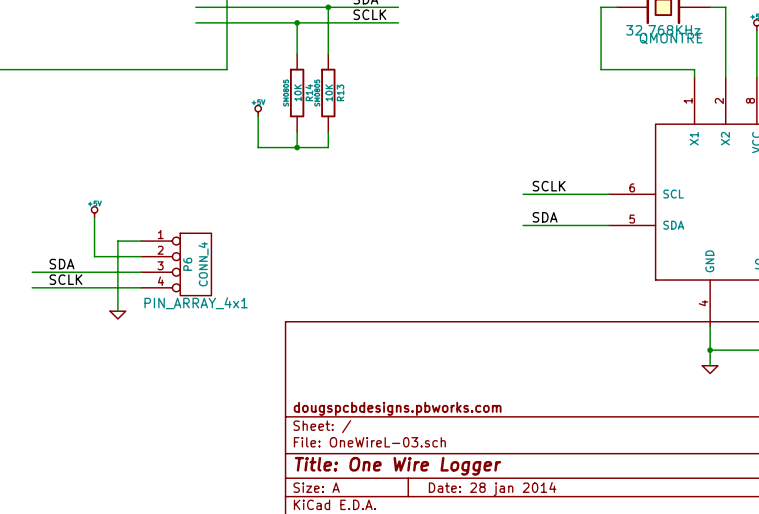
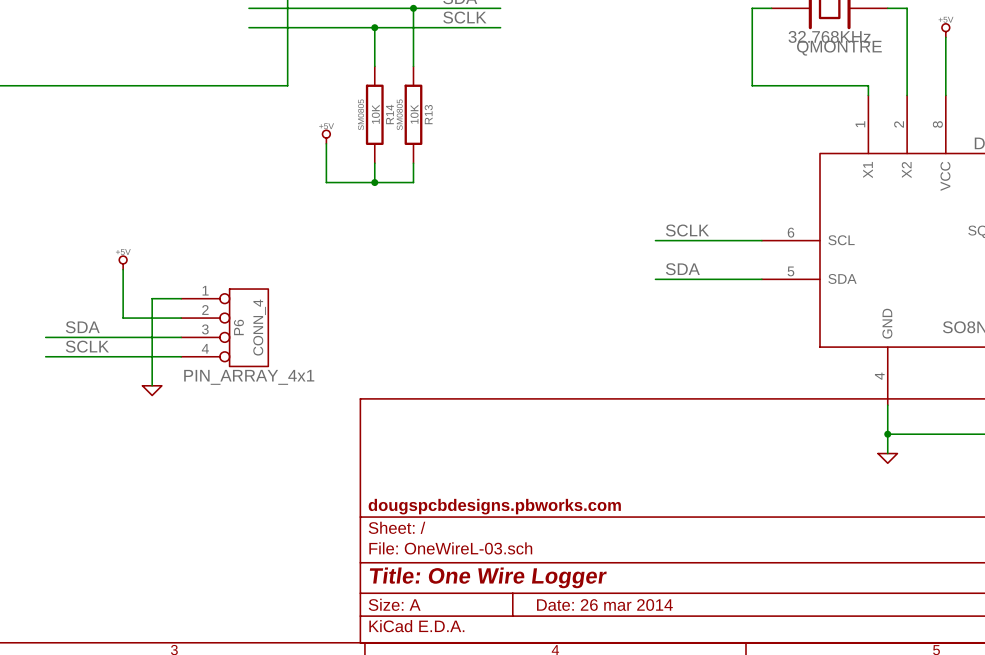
title block: Date: 28 jan 2014 (492, 489) -> Date: 26 mar 2014 (604, 605)

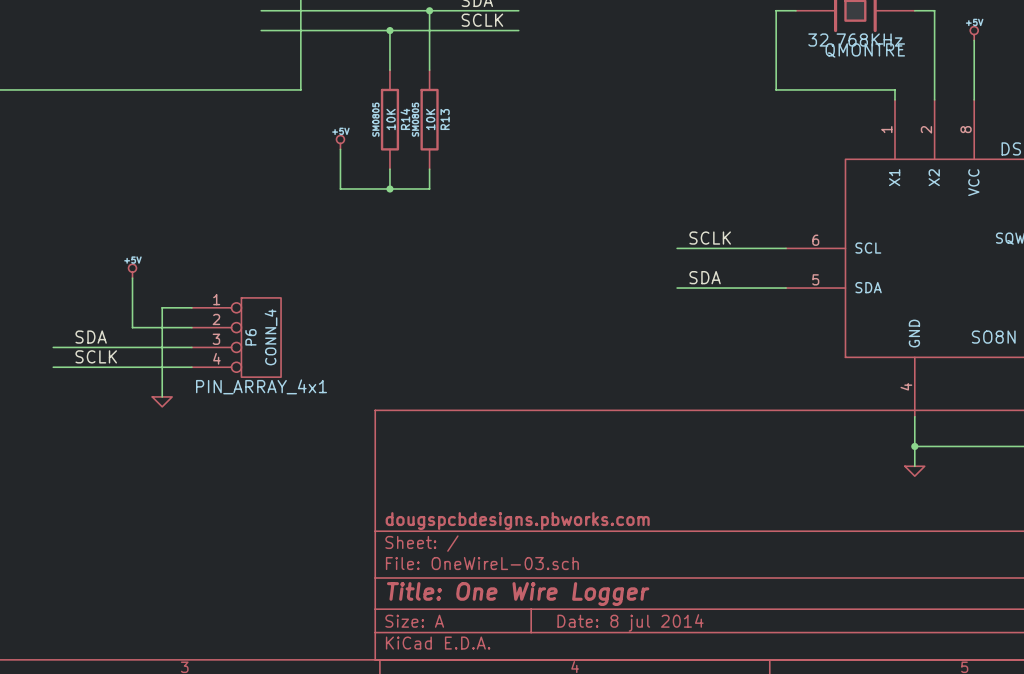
title block: Date: 26 mar 2014 (604, 605) -> Date: 8 jul 2014 (630, 622)

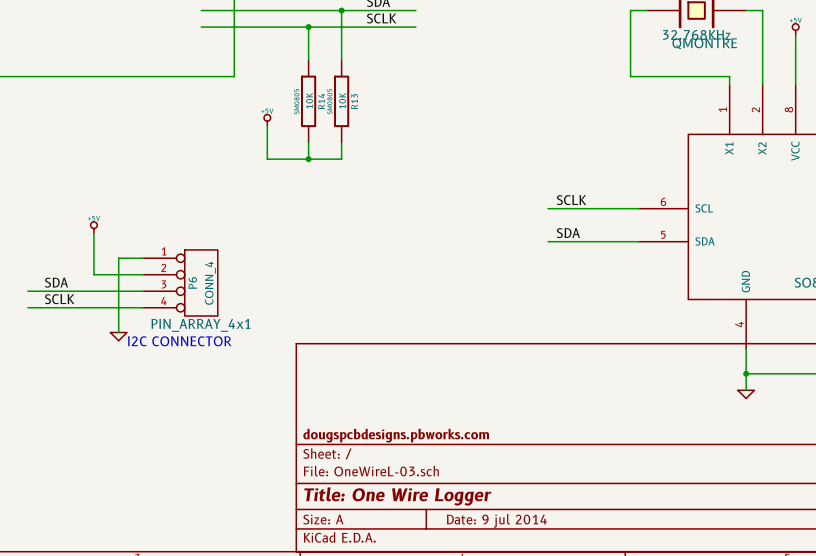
text: none -> I2C CONNECTOR (179, 341)
title block: Date: 8 jul 2014 (630, 622) -> Date: 9 jul 2014 (496, 520)

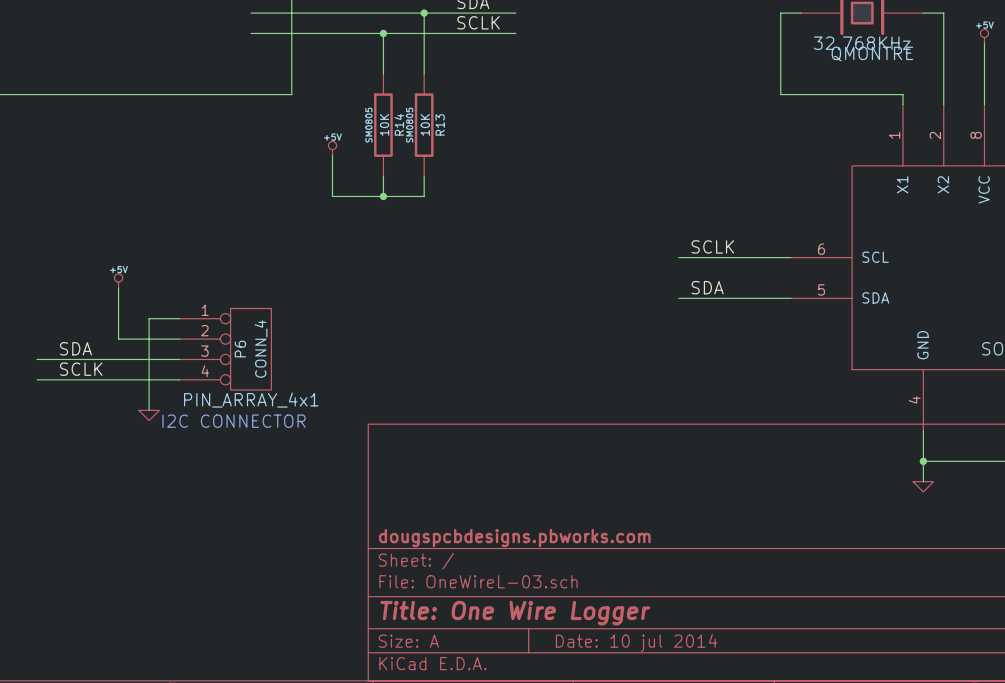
title block: Date: 9 jul 2014 (496, 520) -> Date: 10 jul 2014 (636, 642)

